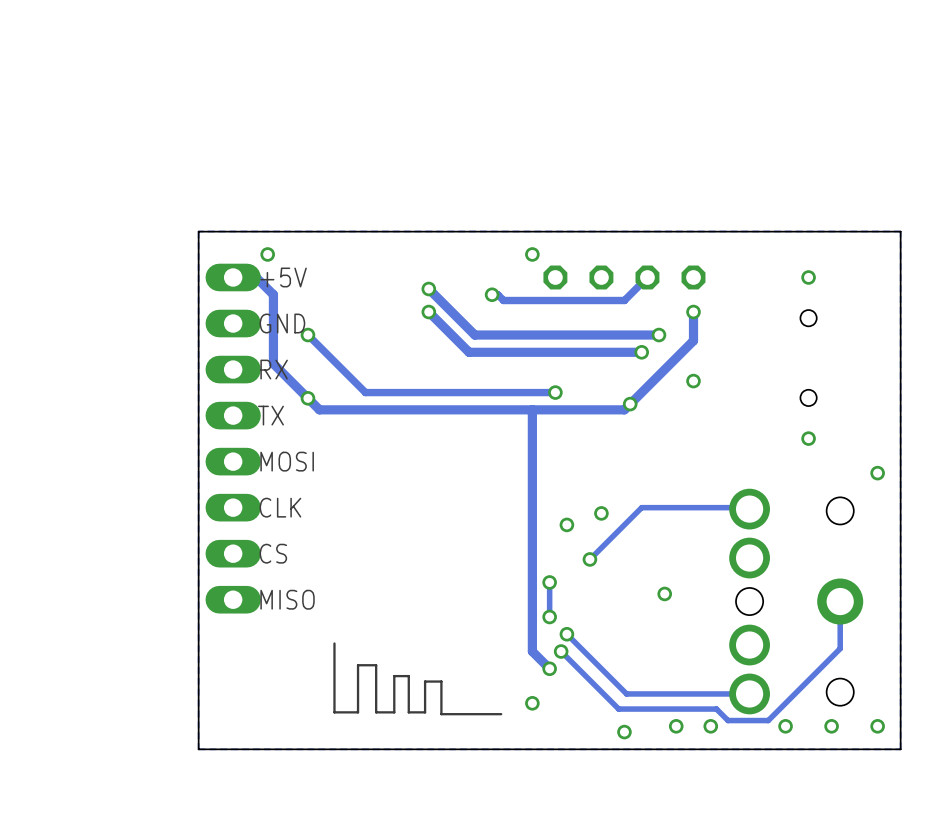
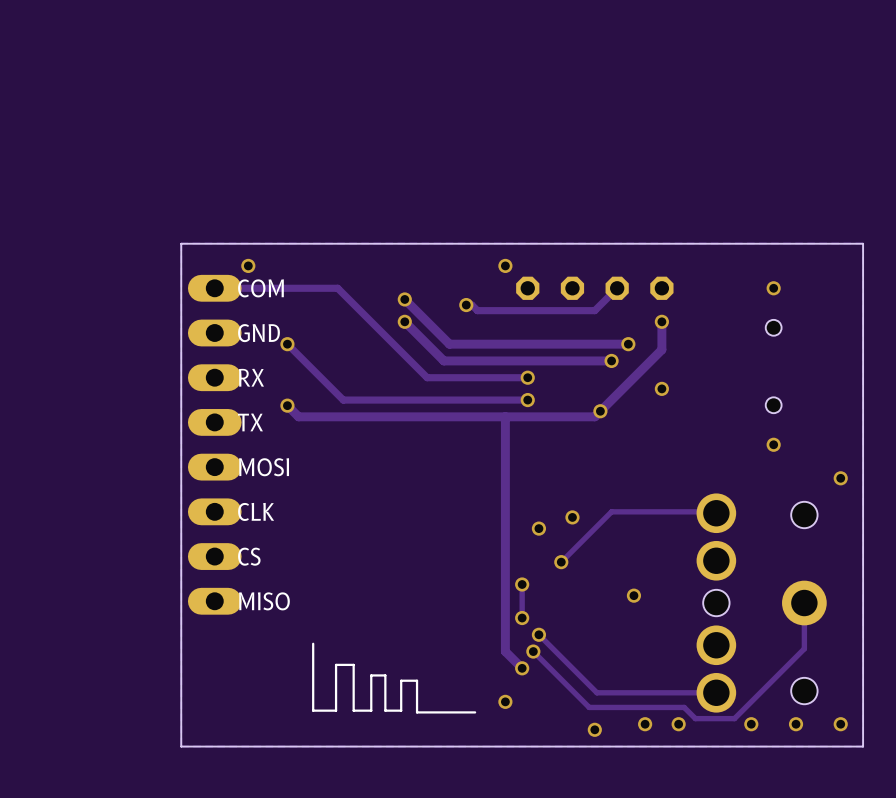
track: (256, 277) (273, 294) (273, 363) (307, 398) -> (237, 288) (337, 288) (427, 377) (527, 377)
text: +5V (283, 277) -> COM (260, 288)
via: none -> (527, 377)

